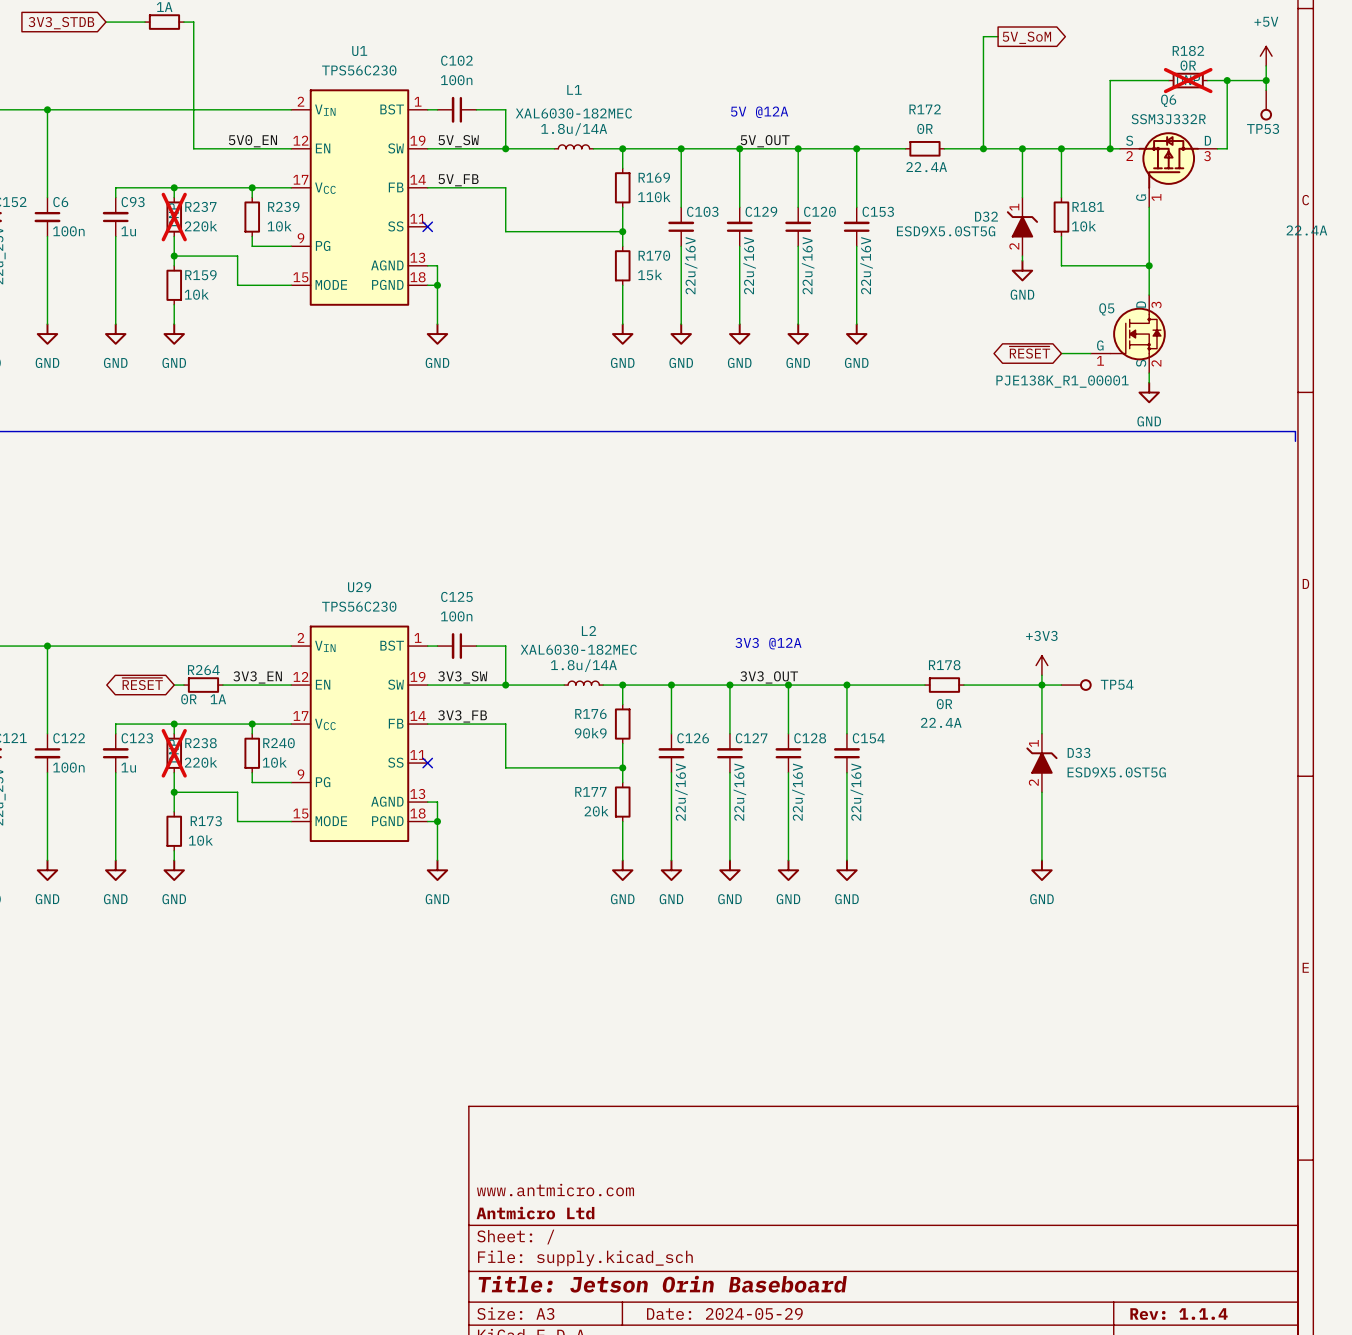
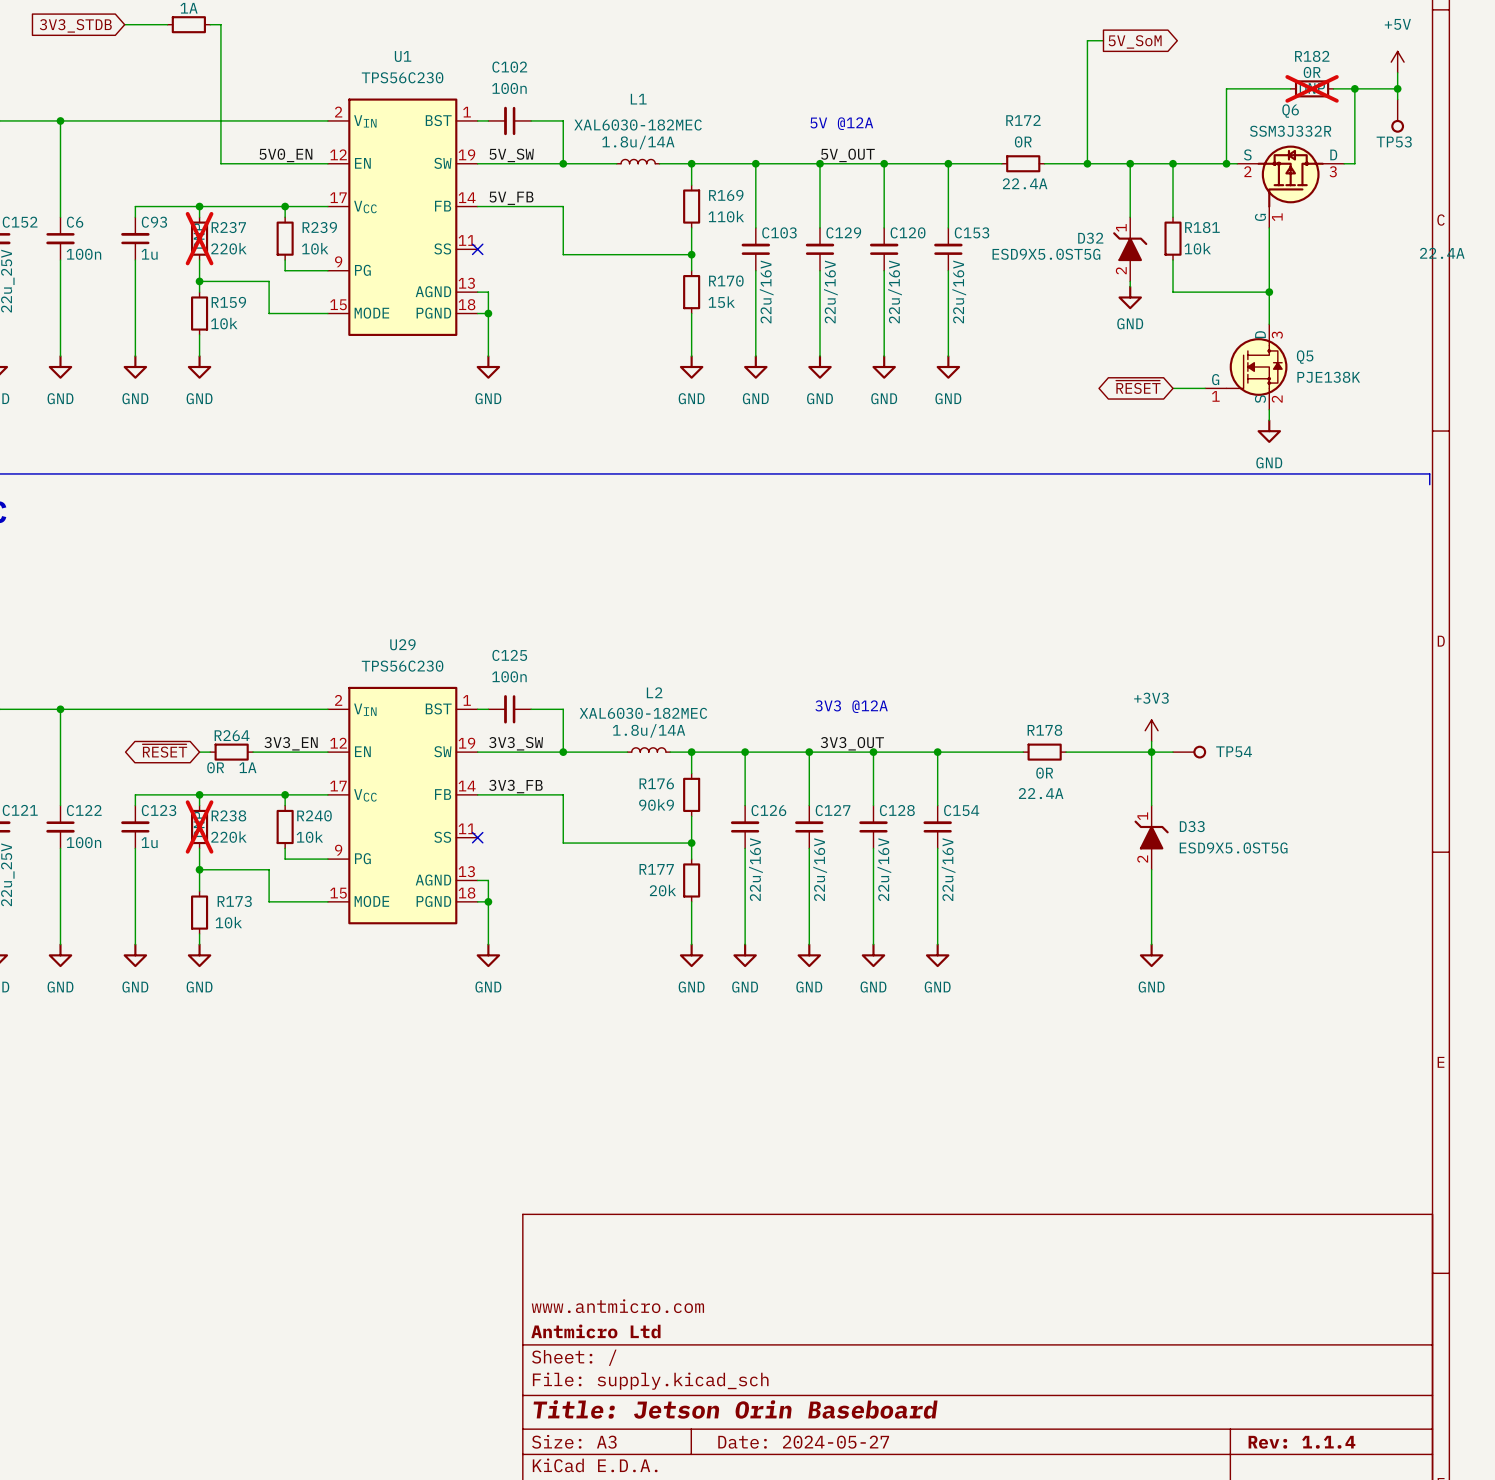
Q5 name position: Q5 (1106, 309) -> Q5 (1305, 357)
Q5 value: none -> PJE138K (1328, 377)
Q5 text: PJE138K_R1_00001 (1062, 381) -> none
title block: Date: 2024-05-29 (724, 1313) -> Date: 2024-05-27 (803, 1442)

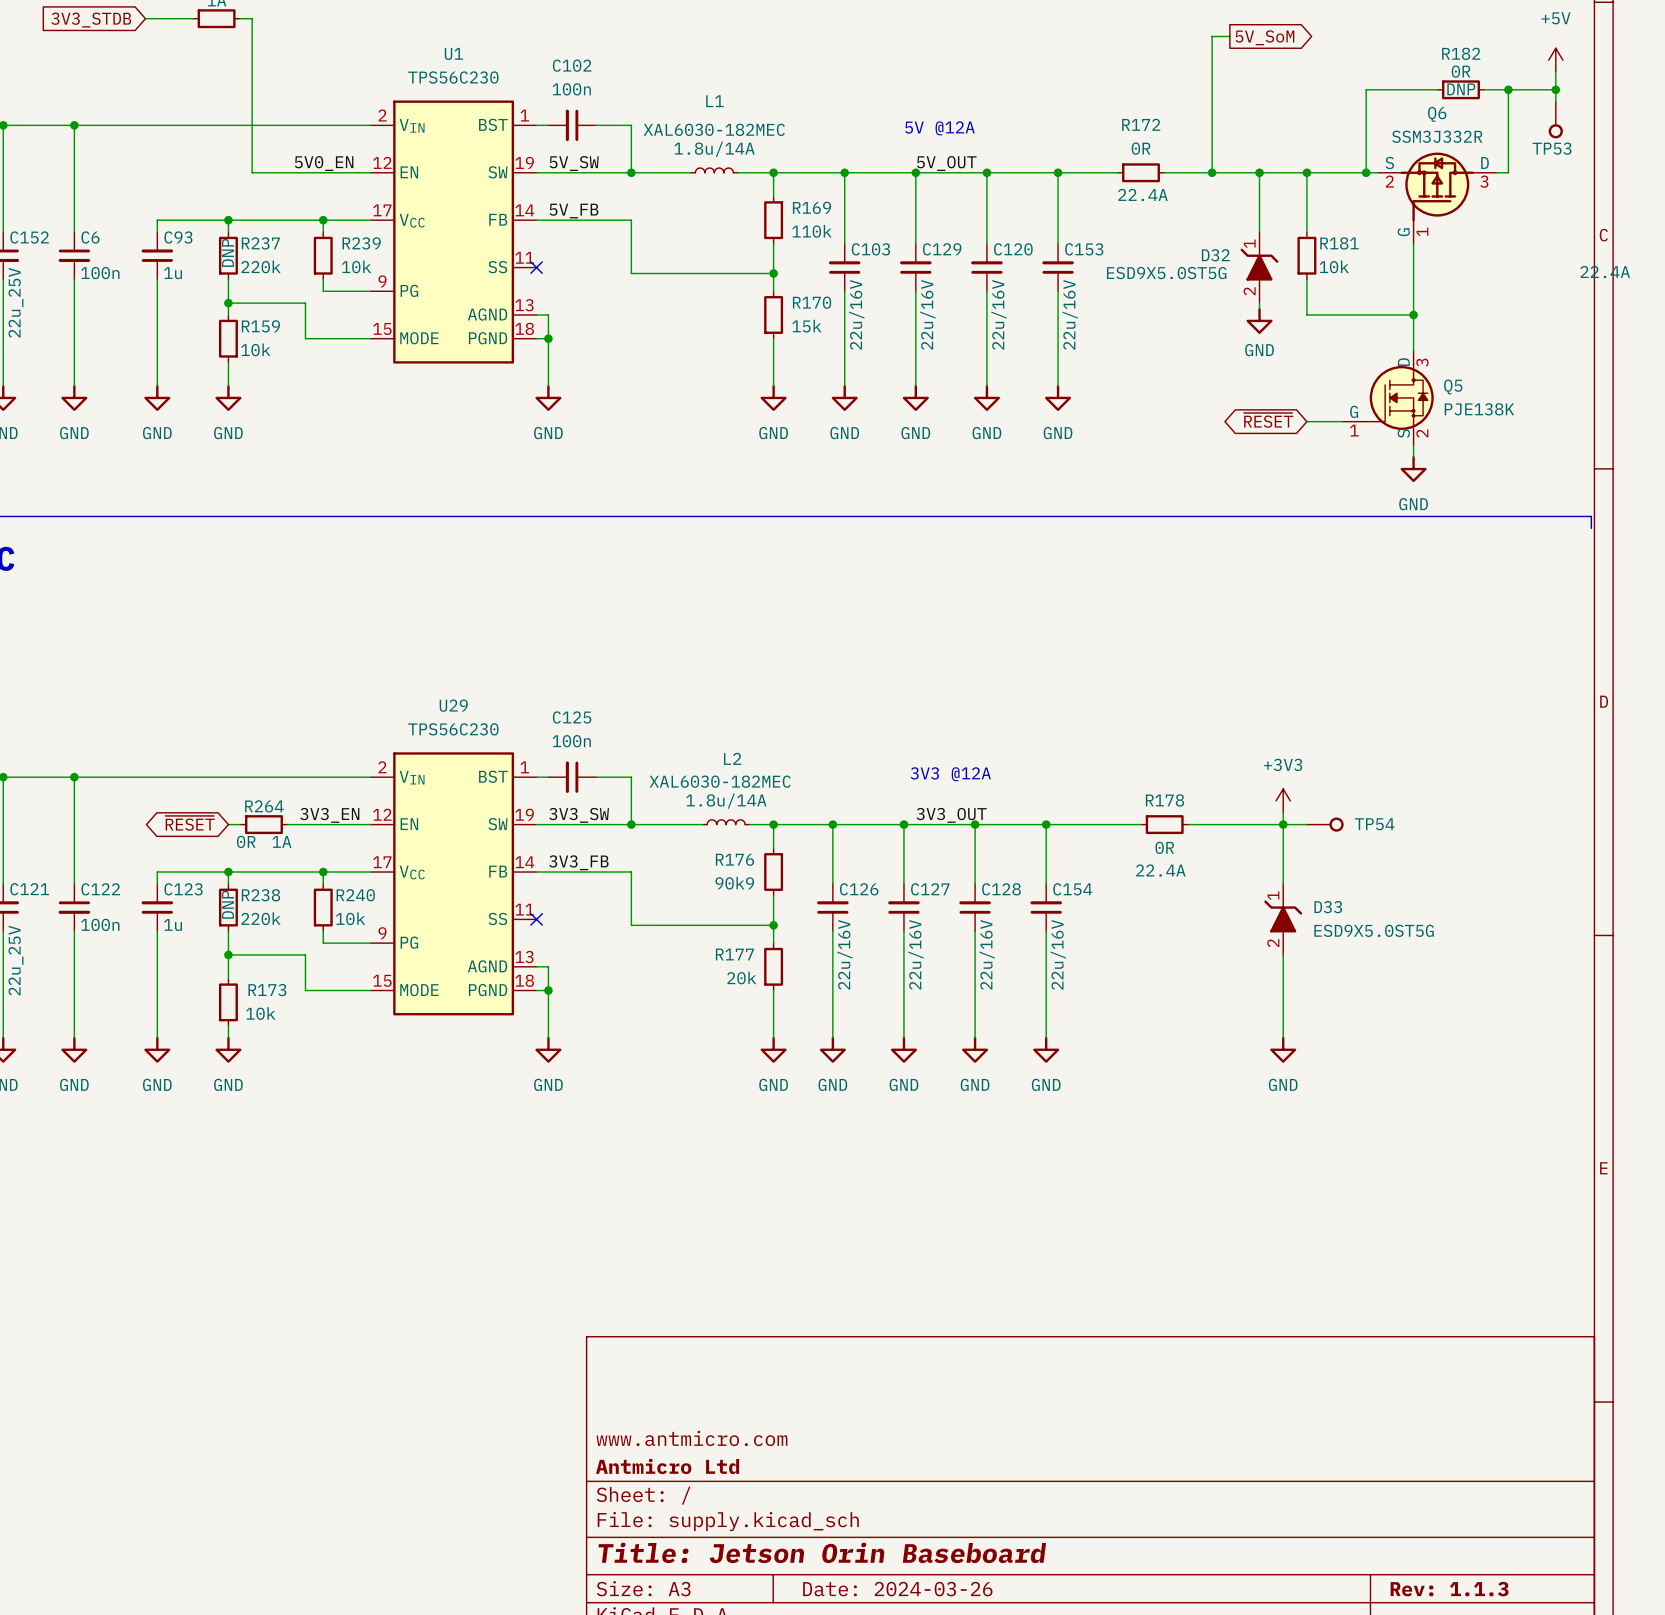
R182 do-not-place cross: (1312, 88) -> none
R237 do-not-place cross: (199, 238) -> none
R238 do-not-place cross: (199, 826) -> none
title block: Date: 2024-05-27 (803, 1442) -> Date: 2024-03-26 (897, 1589)
title block: Rev: 1.1.4 (1301, 1442) -> Rev: 1.1.3 (1449, 1589)

